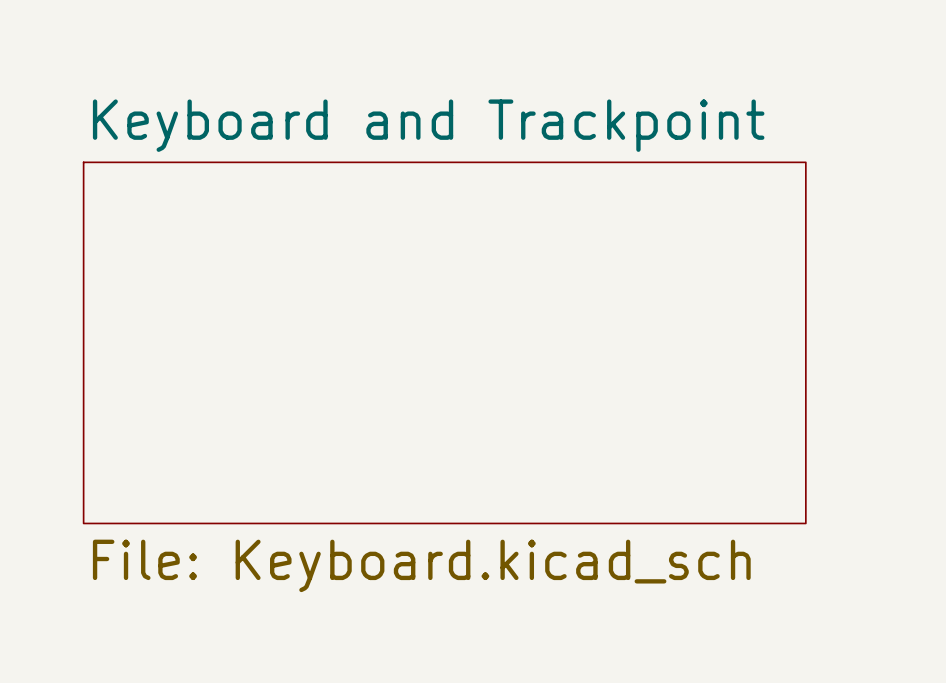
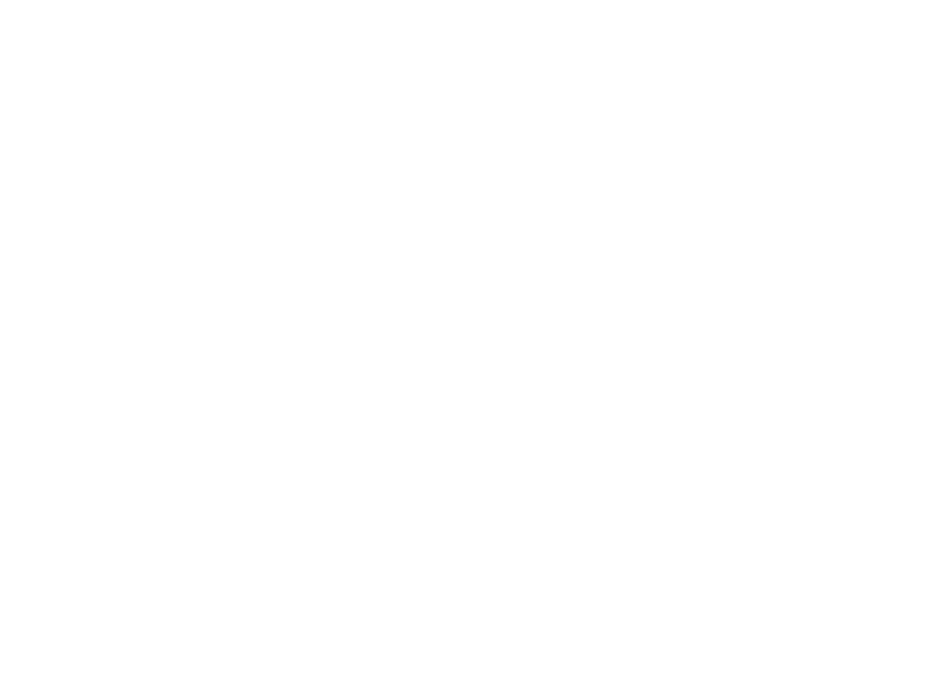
sheet Keyboard and Trackpoint: File: Keyboard.kicad_sch (444, 342) -> none

